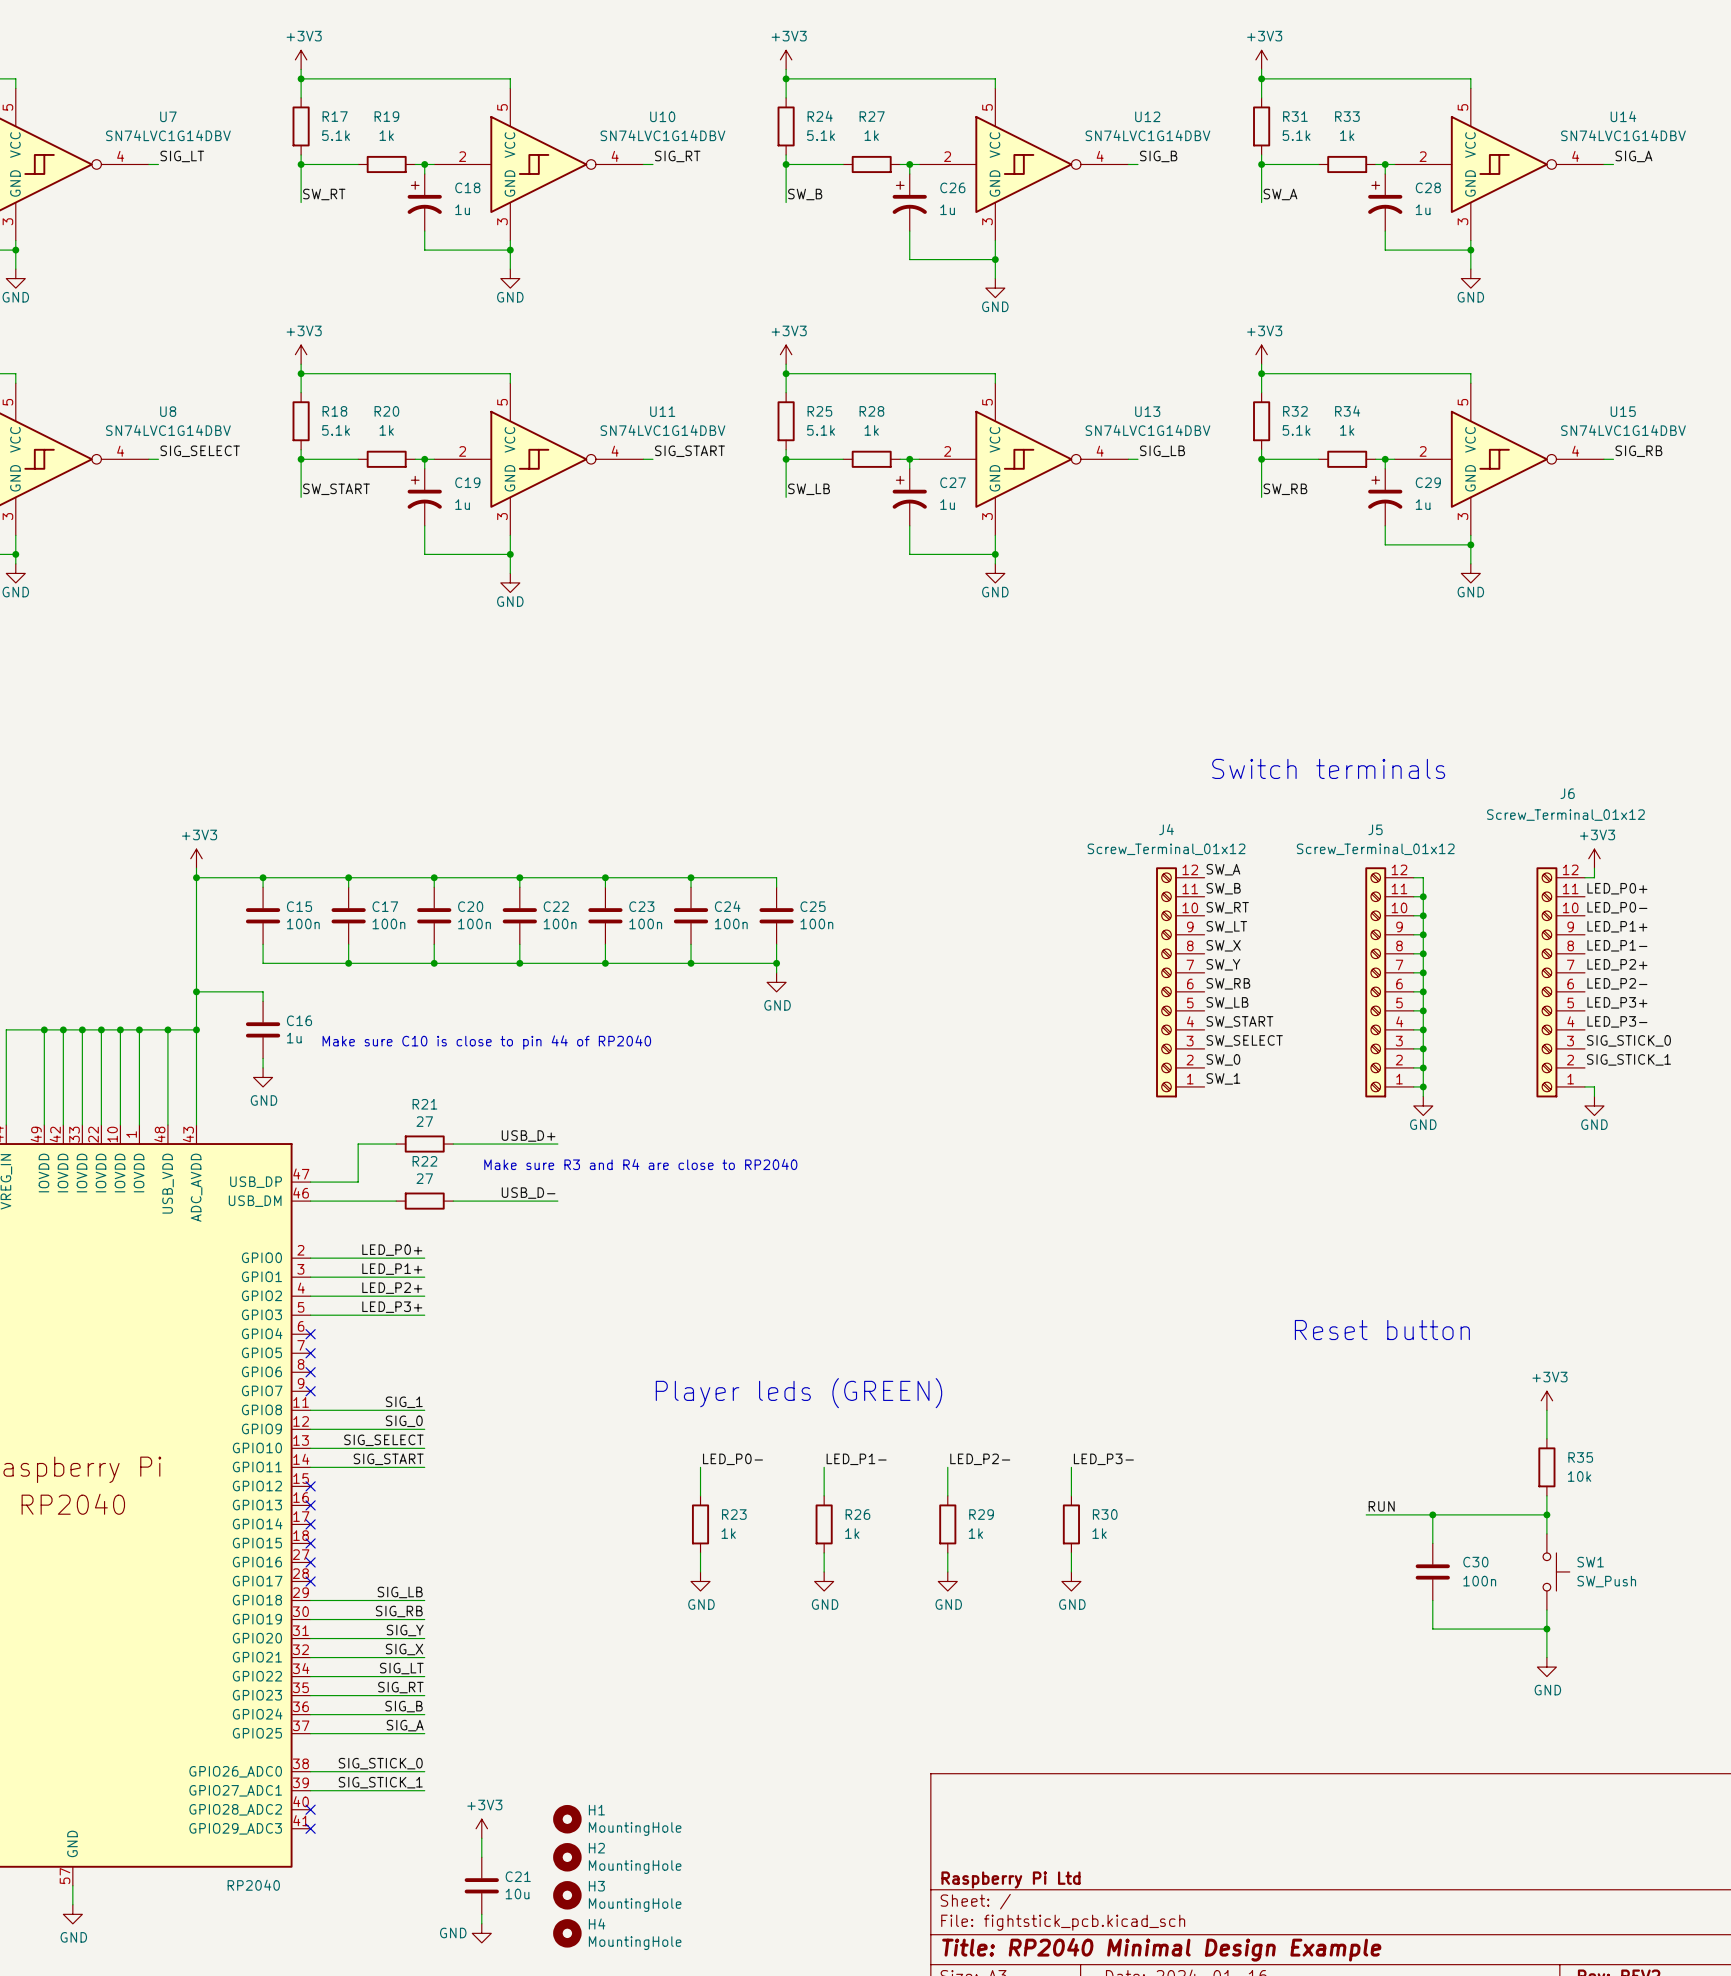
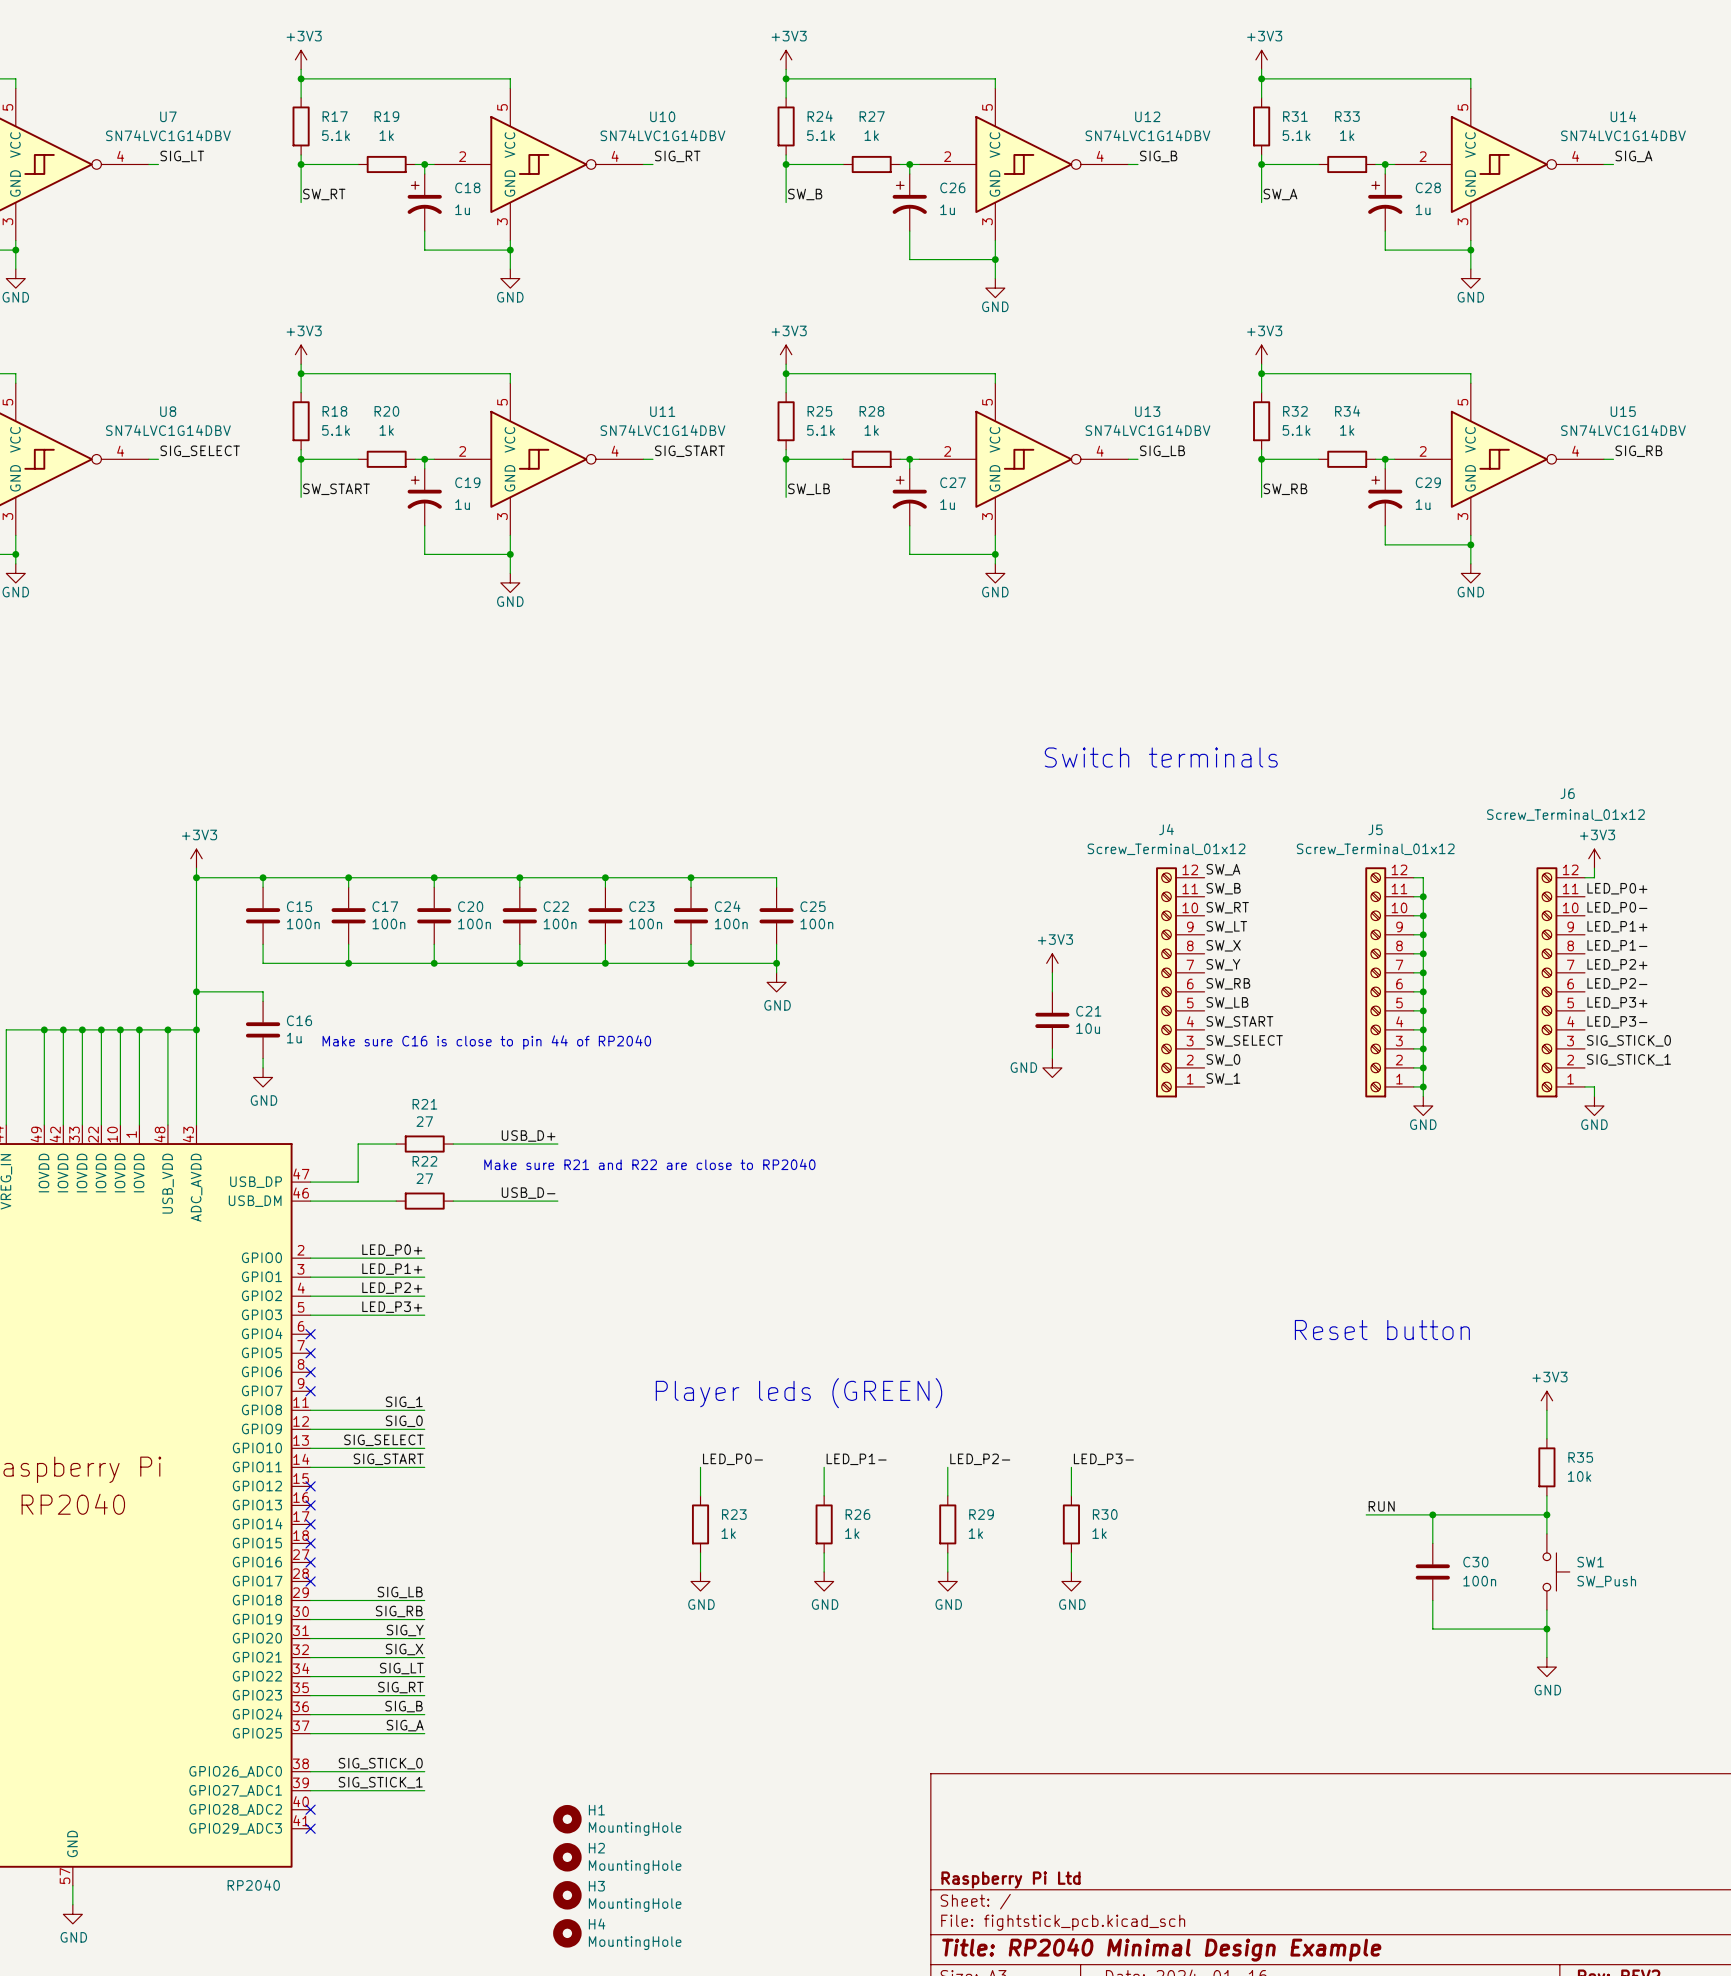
text position: Switch terminals (1328, 768) -> Switch terminals (1161, 757)
power symbol: none -> +3V3 (1052, 963)
wire: none -> (1052, 972) (1052, 991)
text: Make sure C10 is close to pin 44 of RP2040 (486, 1042) -> Make sure C16 is close to pin 44 of RP2040 (486, 1042)
wire: none -> (1052, 1048) (1052, 1058)
power symbol: none -> GND (1052, 1067)
text: Make sure R3 and R4 are close to RP2040 (640, 1164) -> Make sure R21 and R22 are close to RP2040 (649, 1164)
power symbol: +3V3 (481, 1828) -> none
wire: (481, 1838) (481, 1857) -> none
C21 position: (481, 1885) -> (1052, 1020)
wire: (481, 1914) (481, 1923) -> none
power symbol: GND (481, 1933) -> none

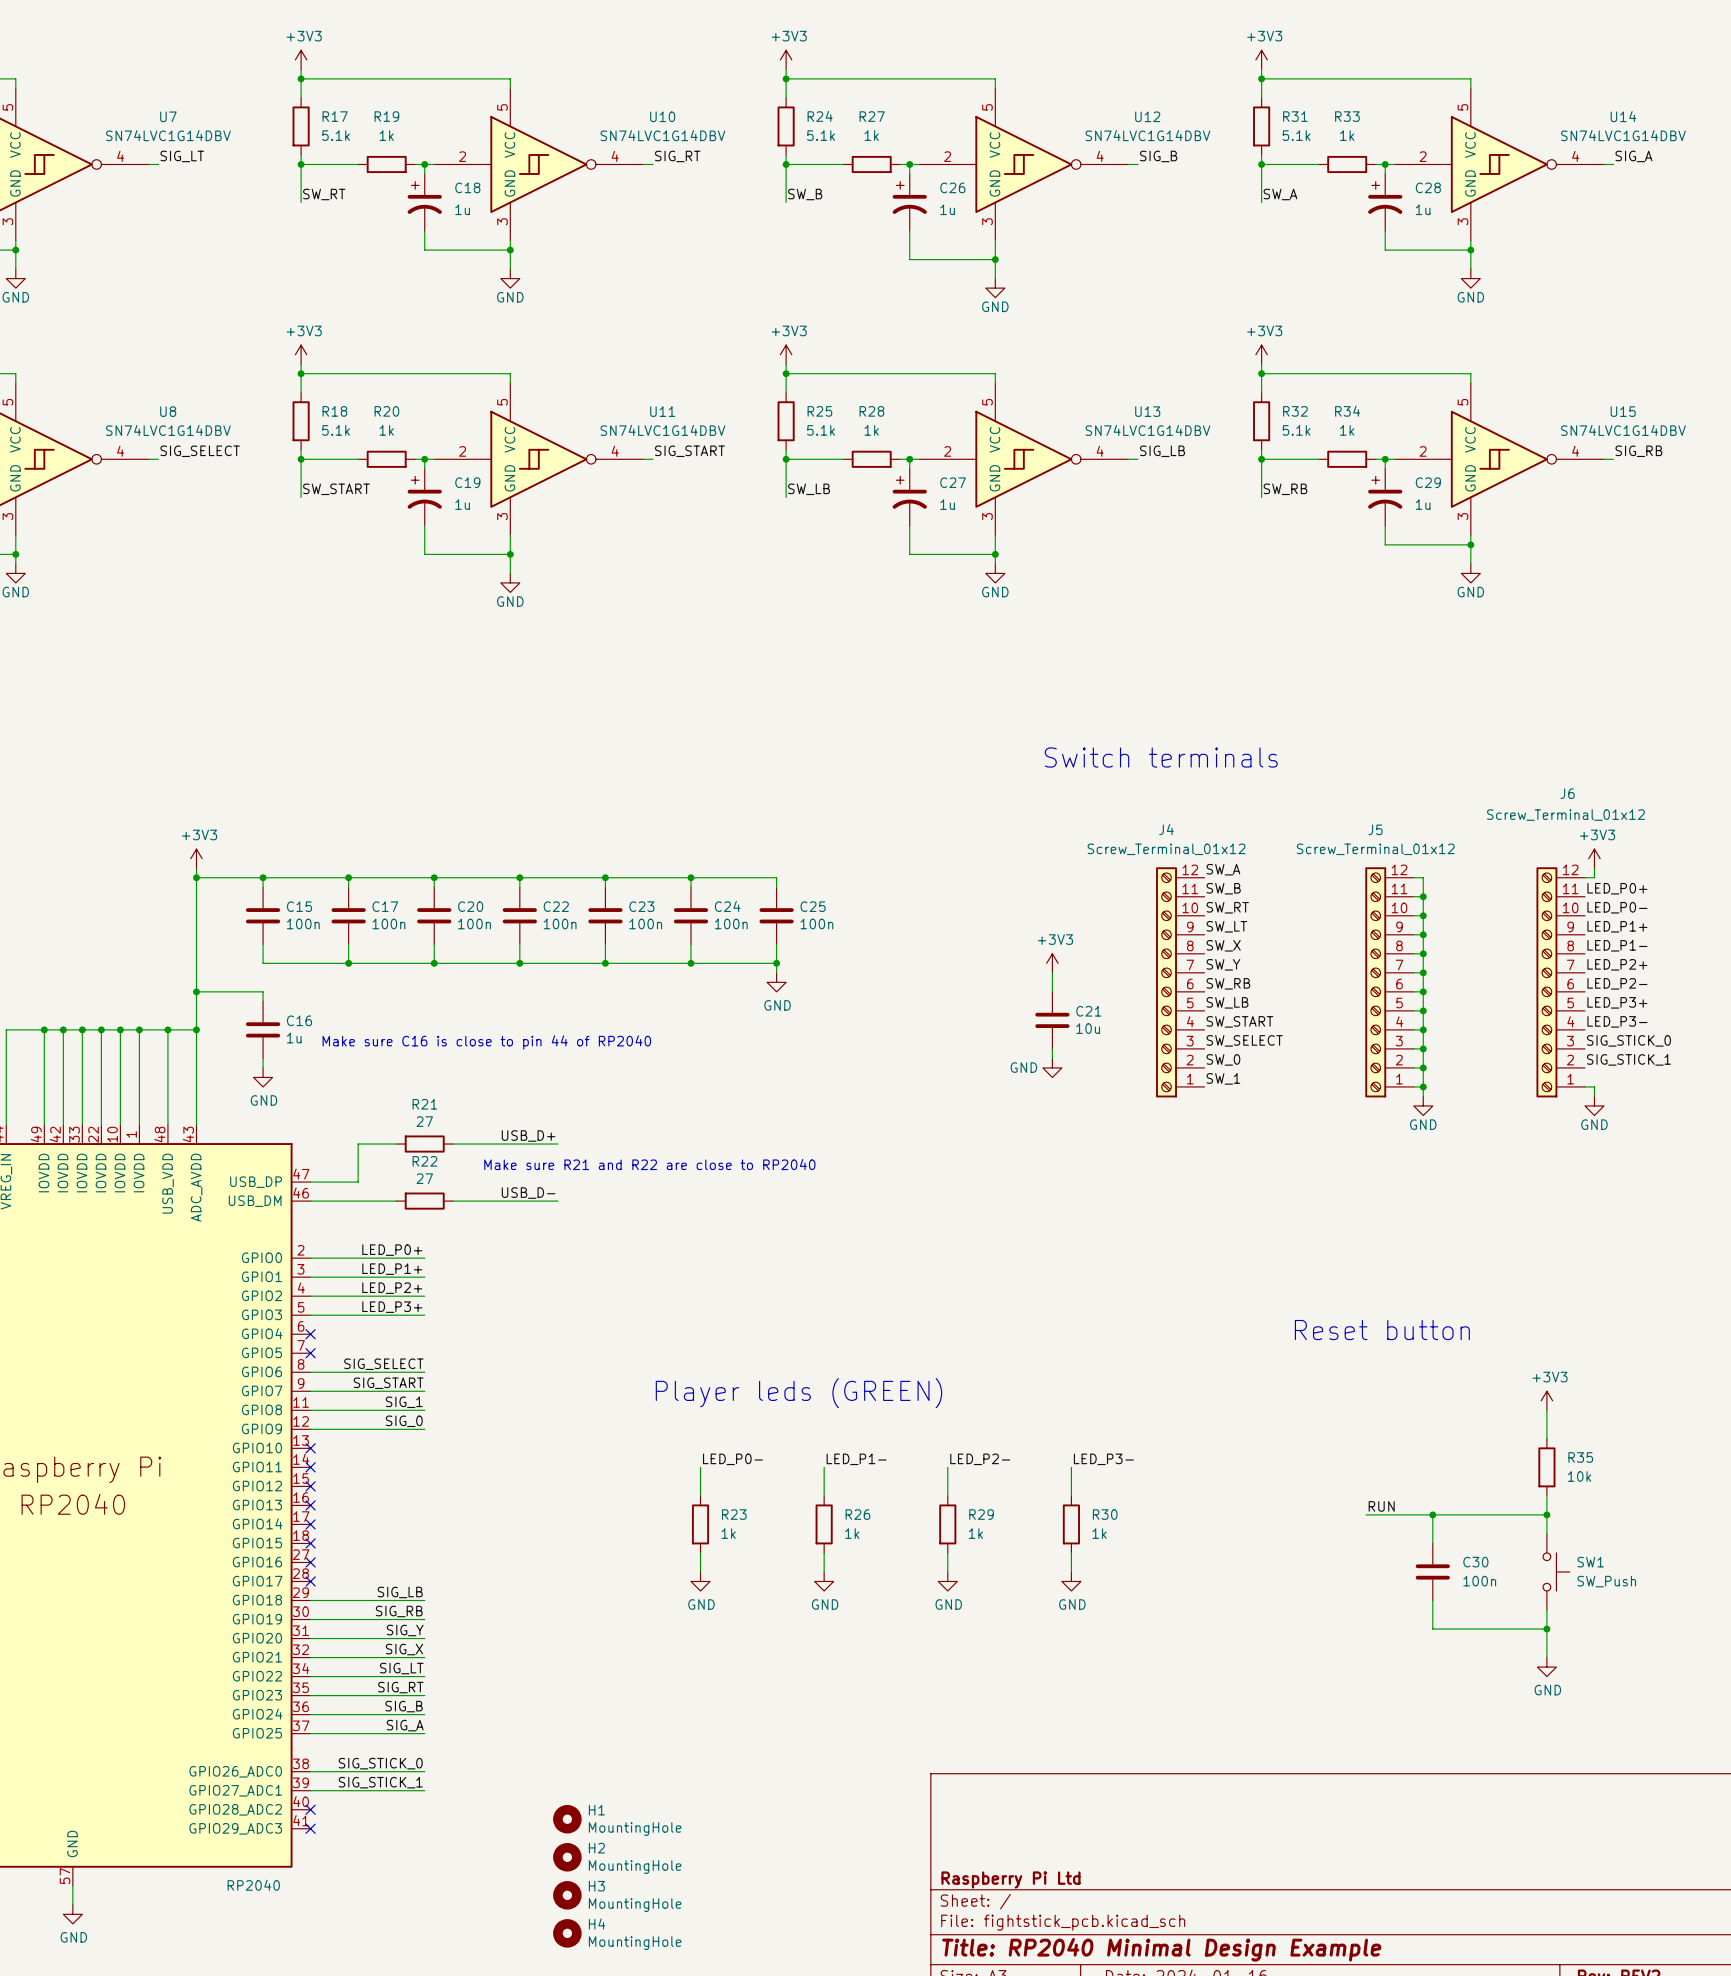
no-connect mark: (310, 1372) -> none
no-connect mark: (310, 1391) -> none
label position: SIG_SELECT (383, 1440) -> SIG_SELECT (383, 1364)
wire: (310, 1448) (424, 1448) -> (310, 1391) (424, 1391)
no-connect mark: none -> (310, 1448)
label position: SIG_START (388, 1459) -> SIG_START (388, 1383)
wire: (310, 1467) (424, 1467) -> (310, 1372) (424, 1372)
no-connect mark: none -> (310, 1467)

